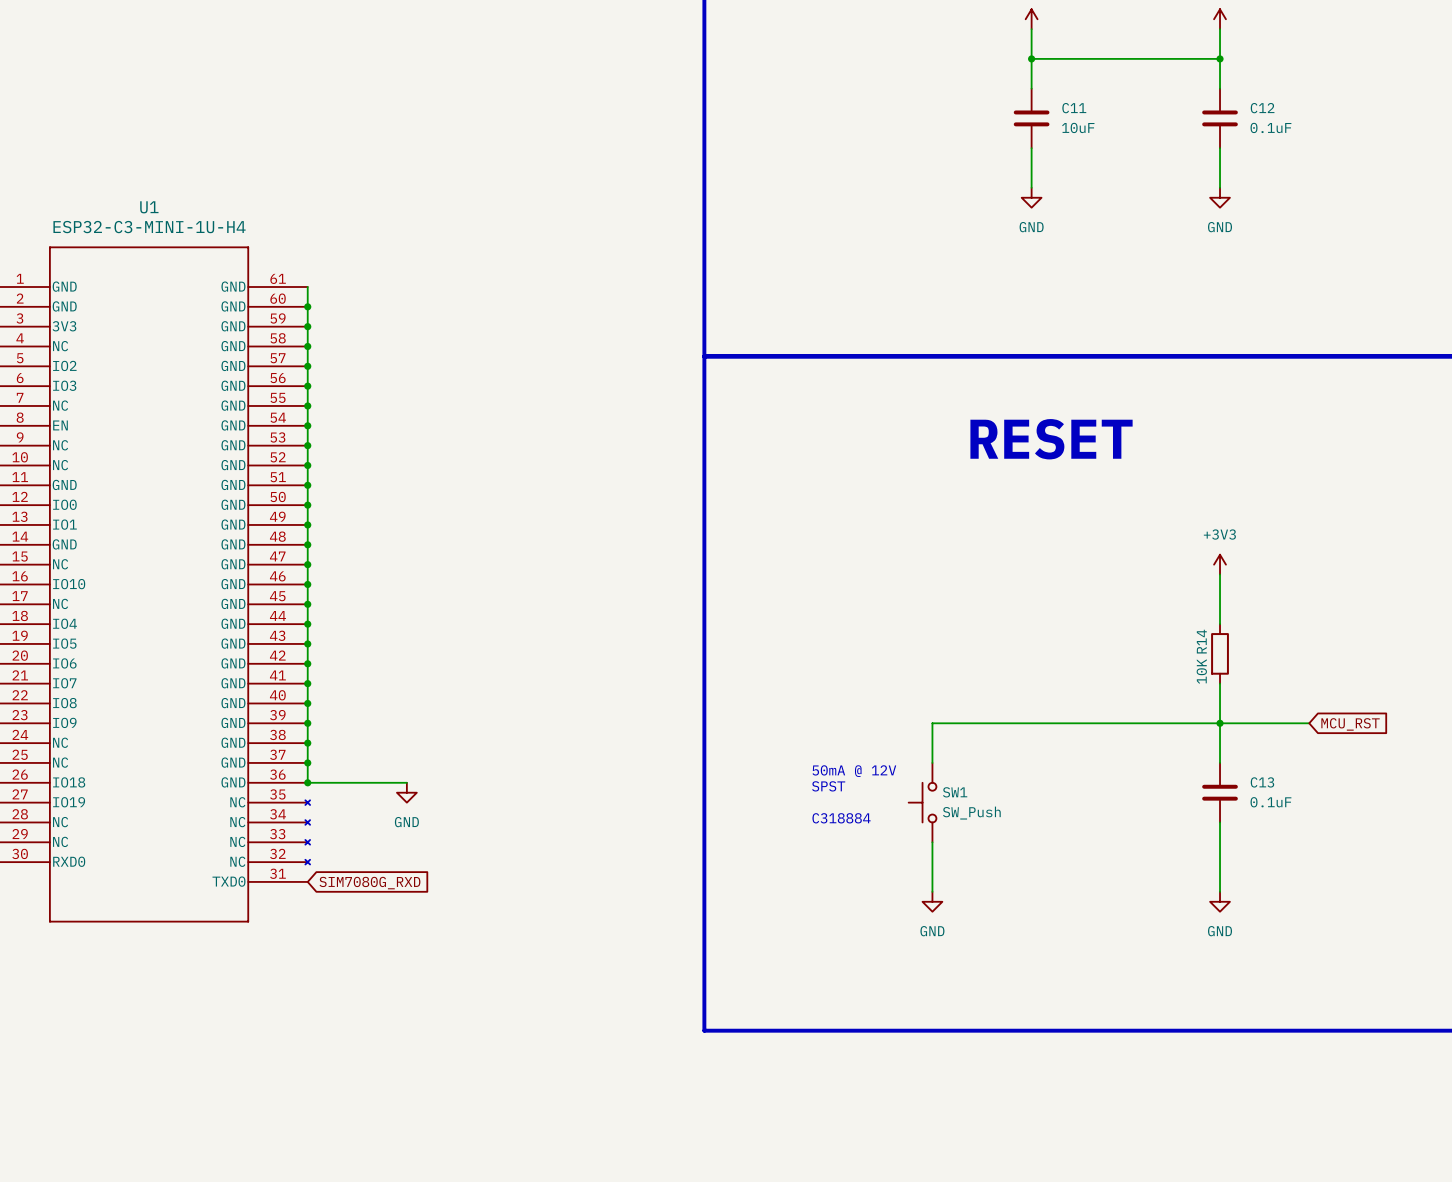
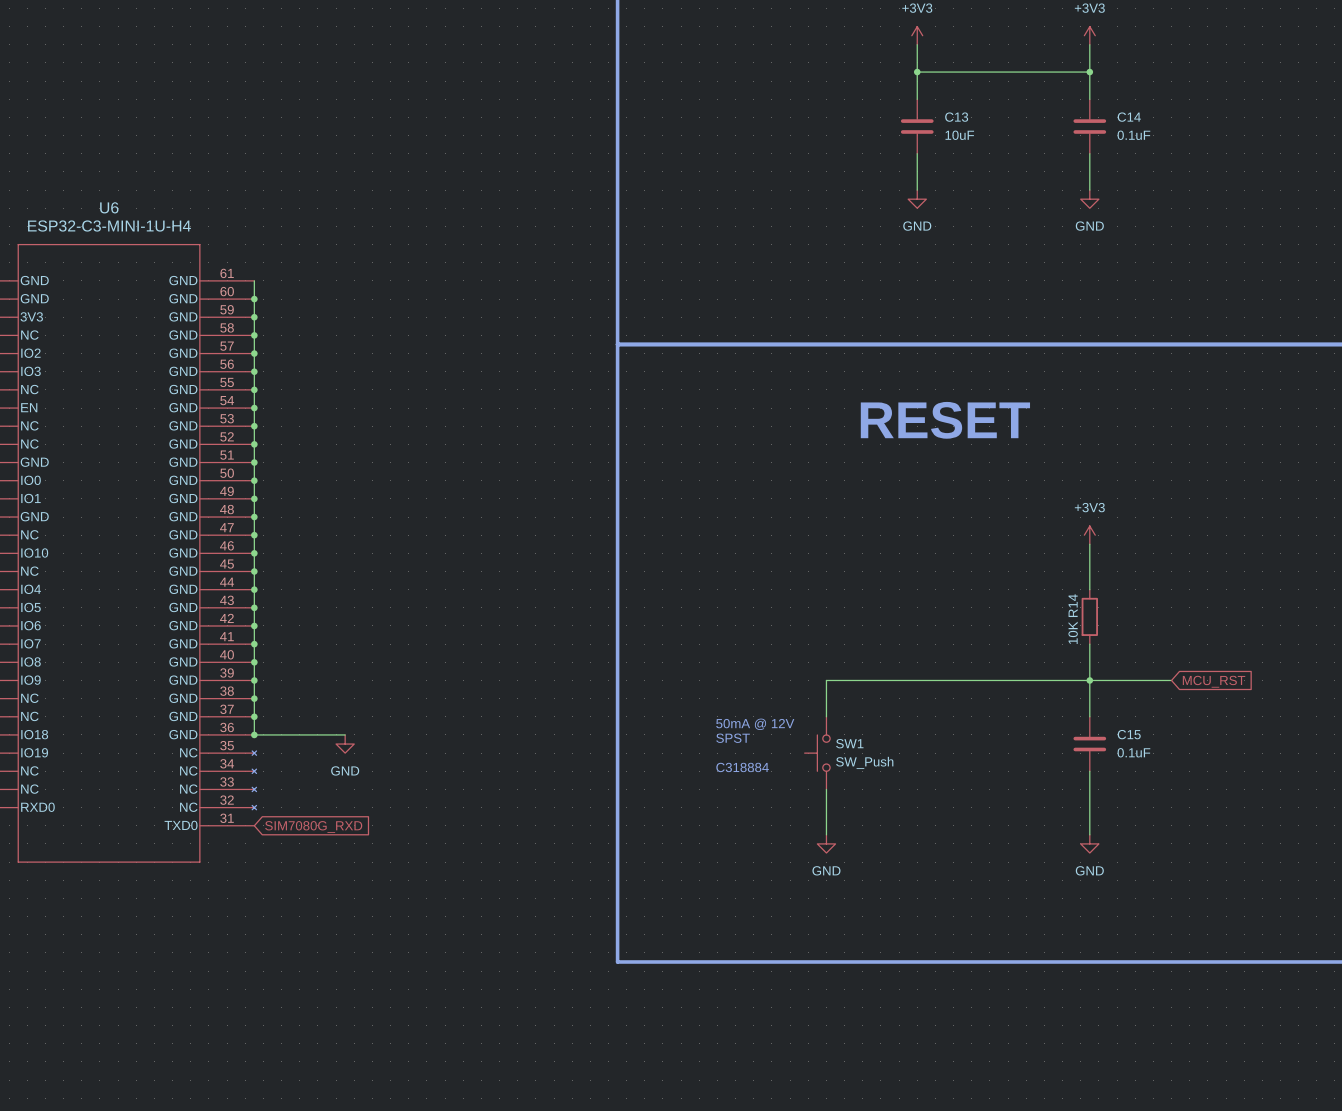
C11 name: C11 (1074, 108) -> C13 (956, 117)
C12 name: C12 (1262, 108) -> C14 (1129, 117)
U1 name: U1 (149, 207) -> U6 (109, 207)
C13 name: C13 (1262, 782) -> C15 (1129, 734)

